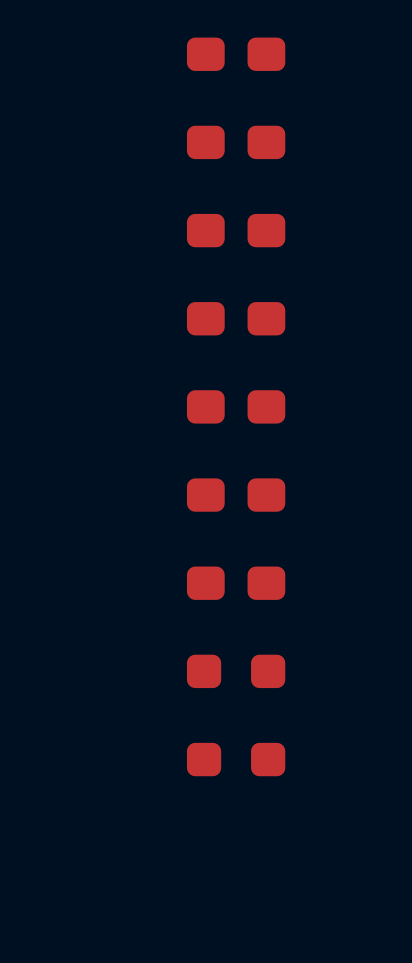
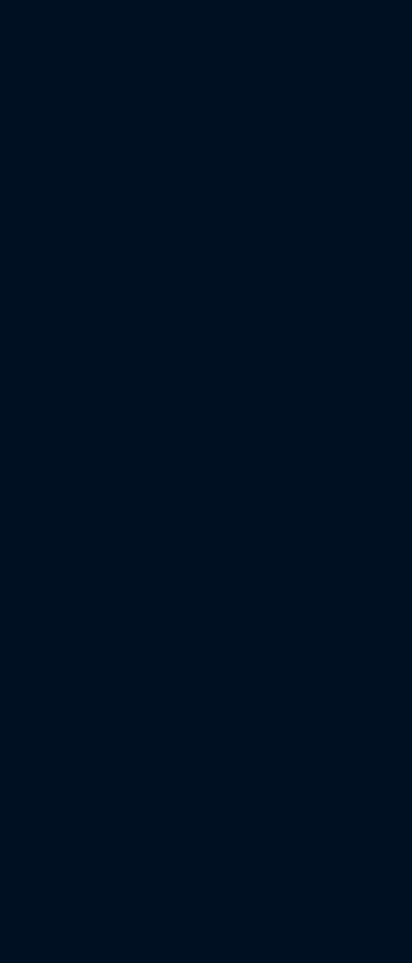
part: (236, 54) -> none
part: (236, 142) -> none
part: (236, 230) -> none
part: (236, 318) -> none
part: (236, 406) -> none
part: (236, 495) -> none
part: (236, 583) -> none
part: (236, 671) -> none
part: (236, 759) -> none

